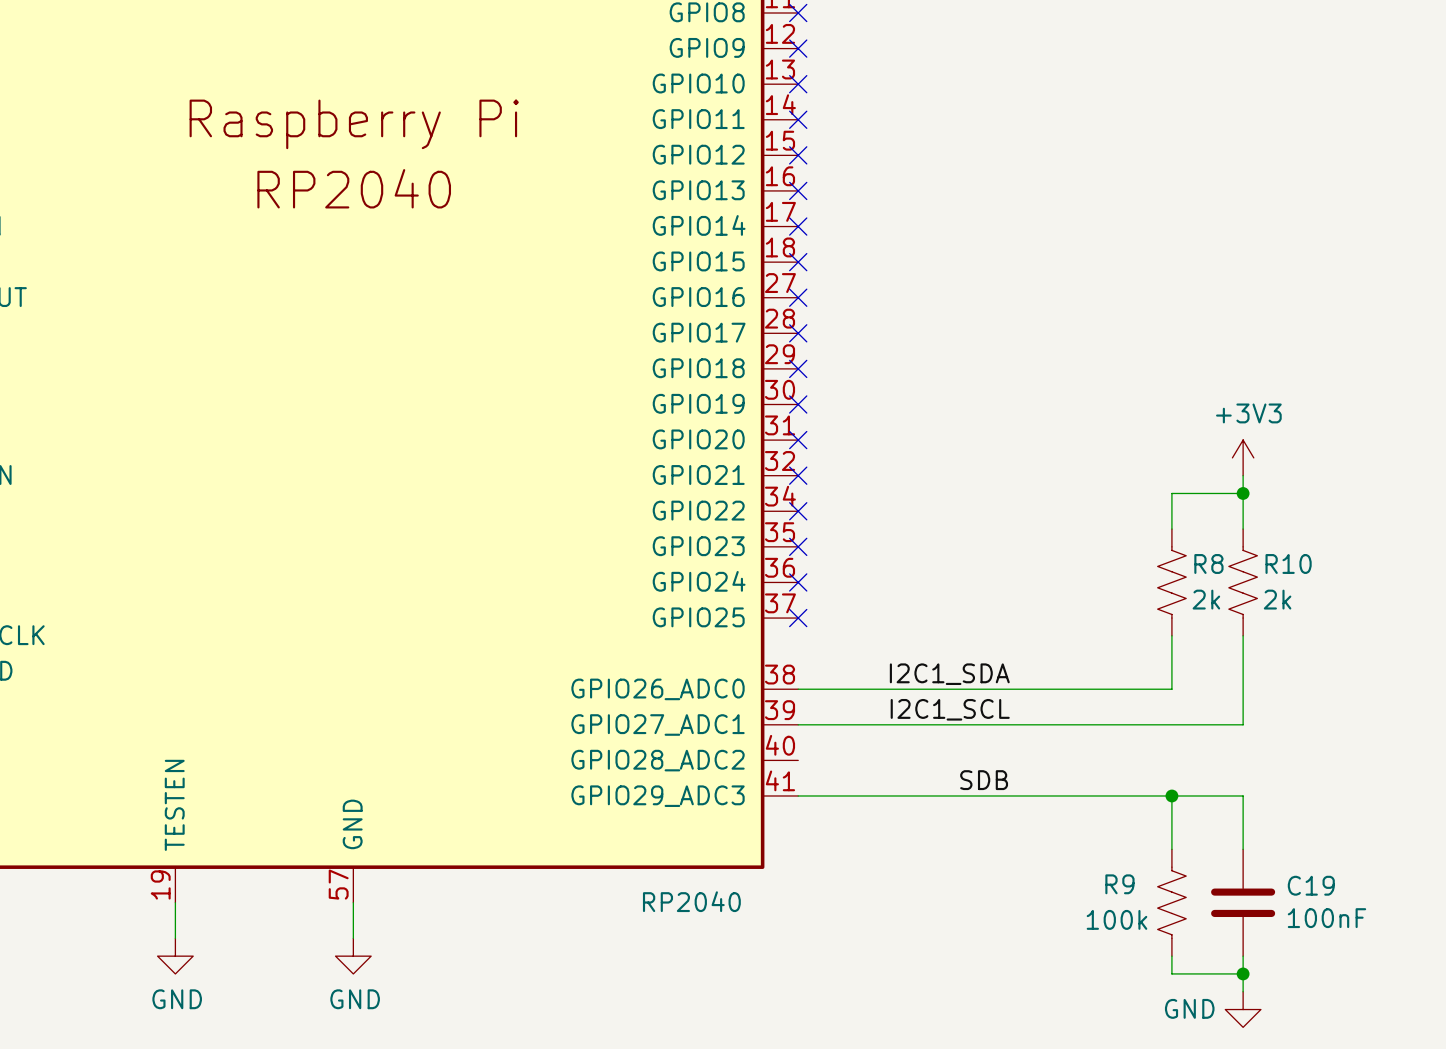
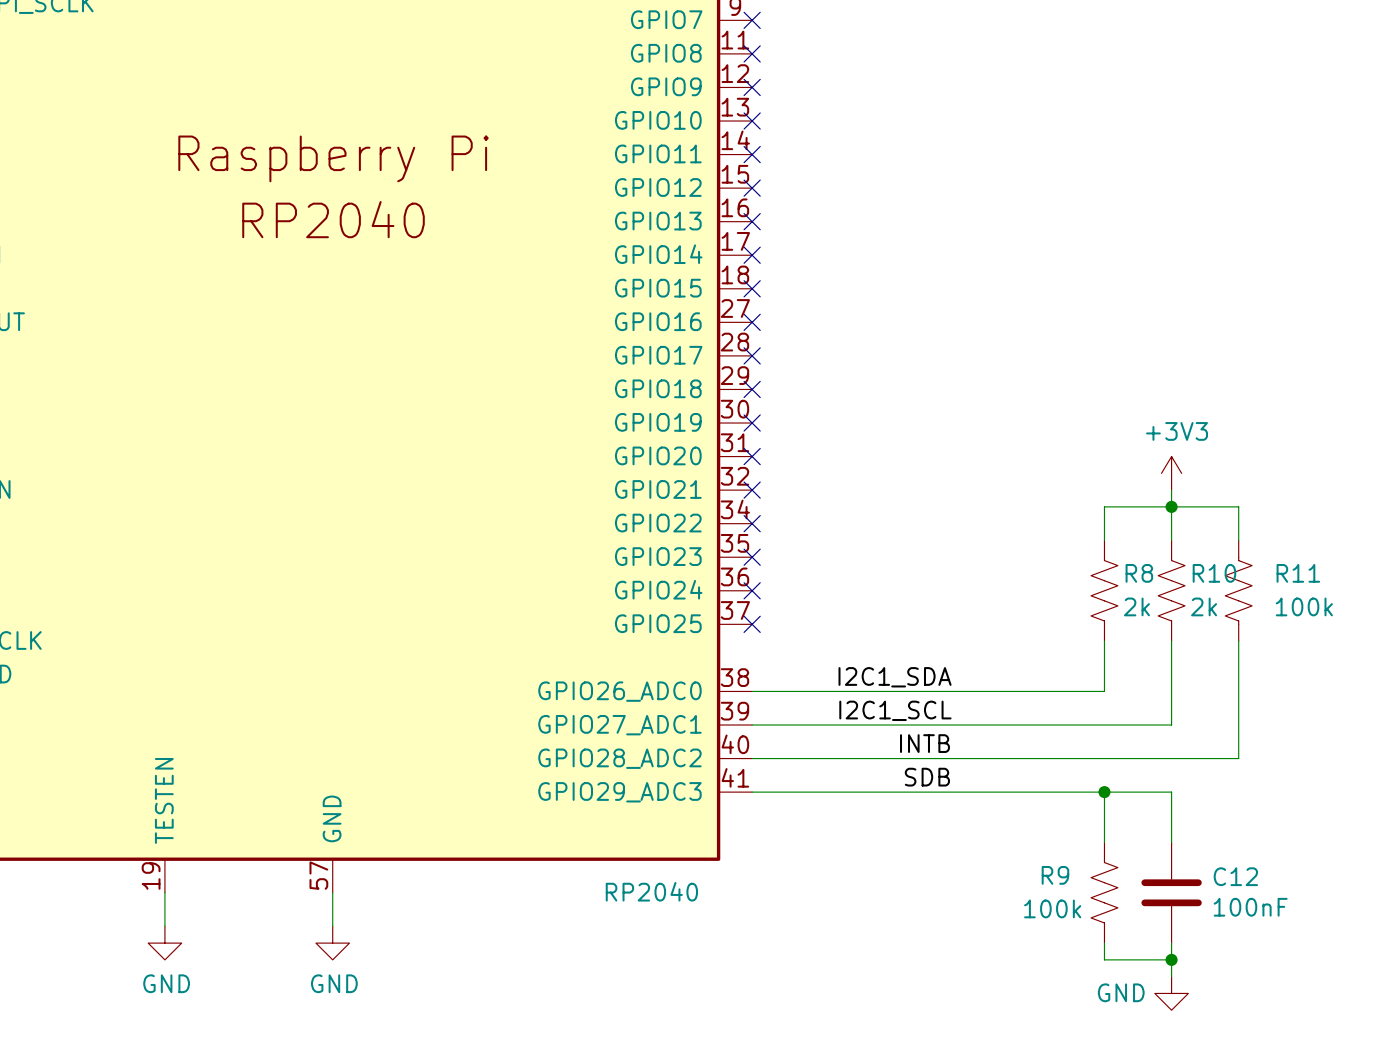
wire: none -> (1171, 506) (1238, 506) (1238, 540)
R11: none -> 100k (1238, 590)
wire: none -> (1238, 641) (1238, 758) (752, 758)
label: none -> INTB (924, 743)
C19 name: C19 (1311, 885) -> C12 (1235, 876)

